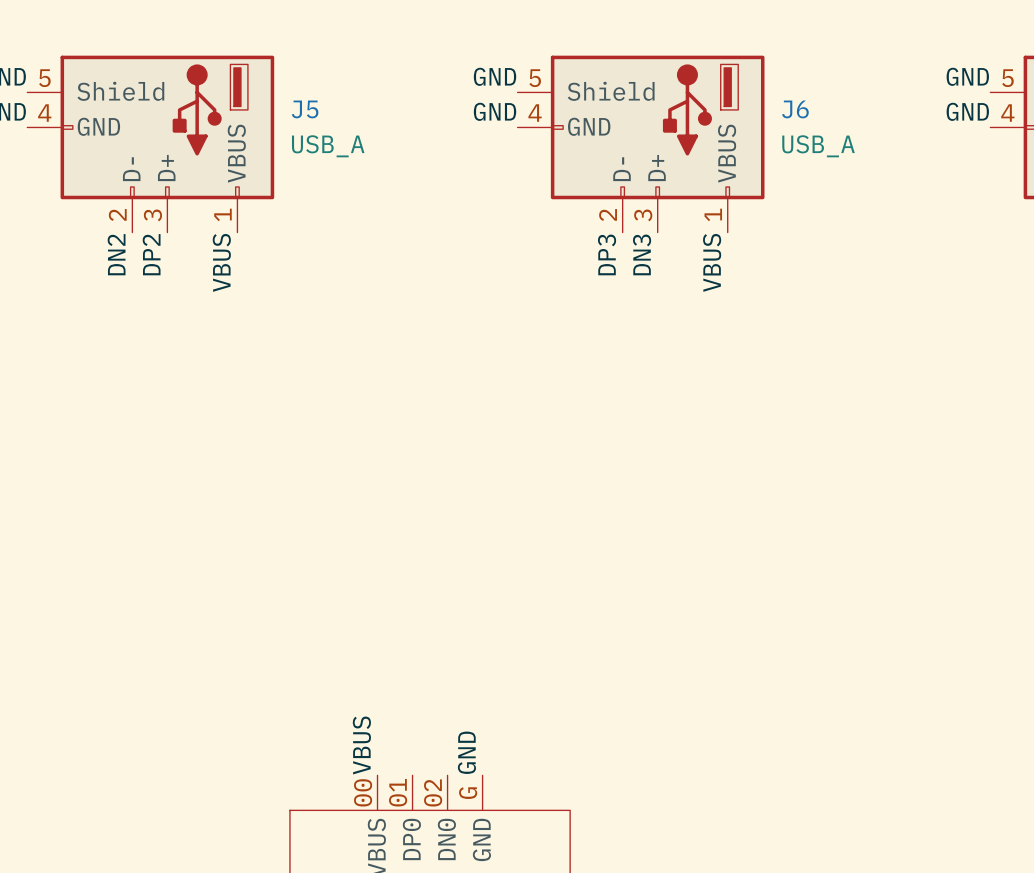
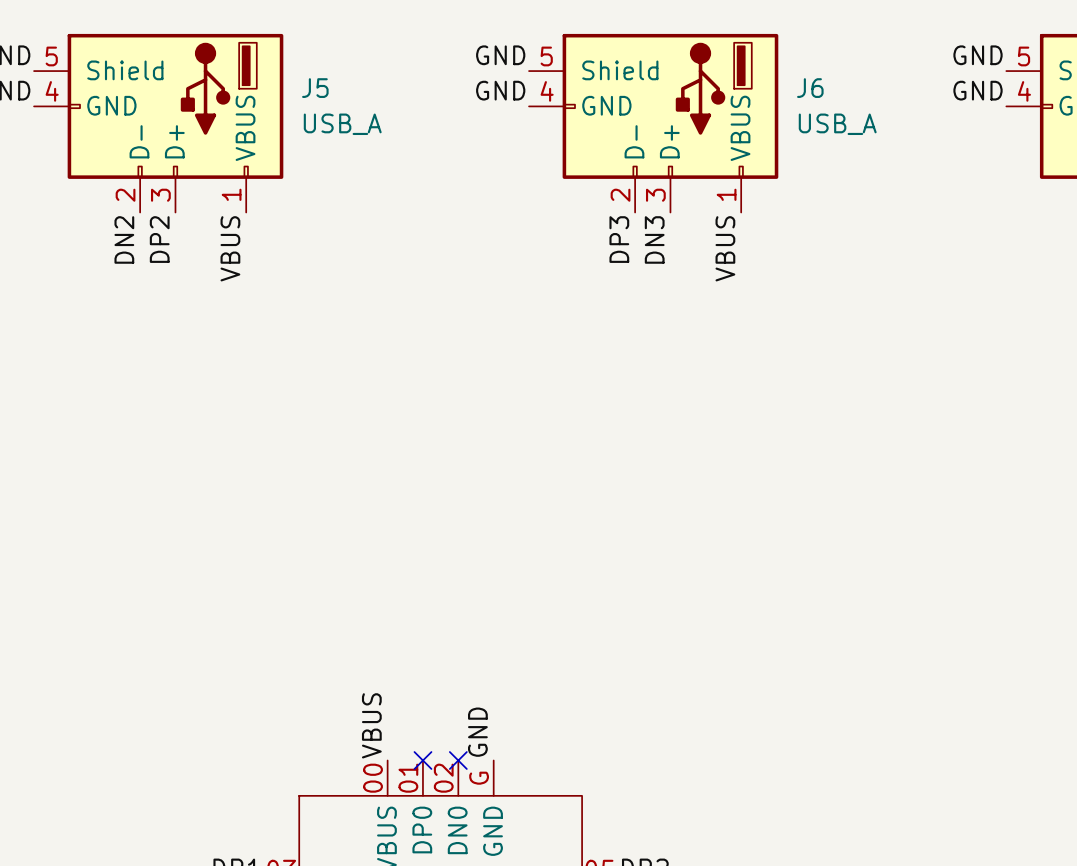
no-connect mark: none -> (422, 760)
no-connect mark: none -> (458, 760)

